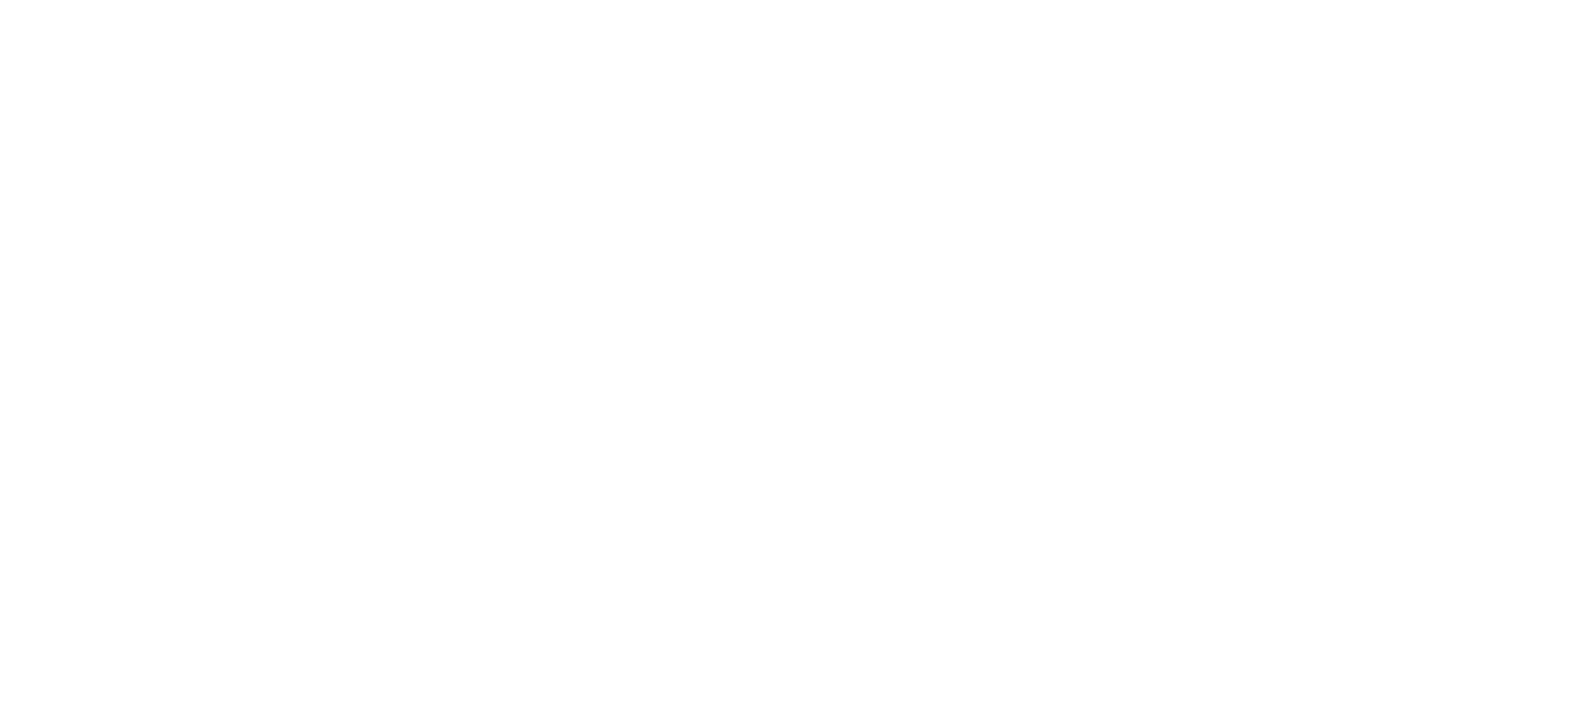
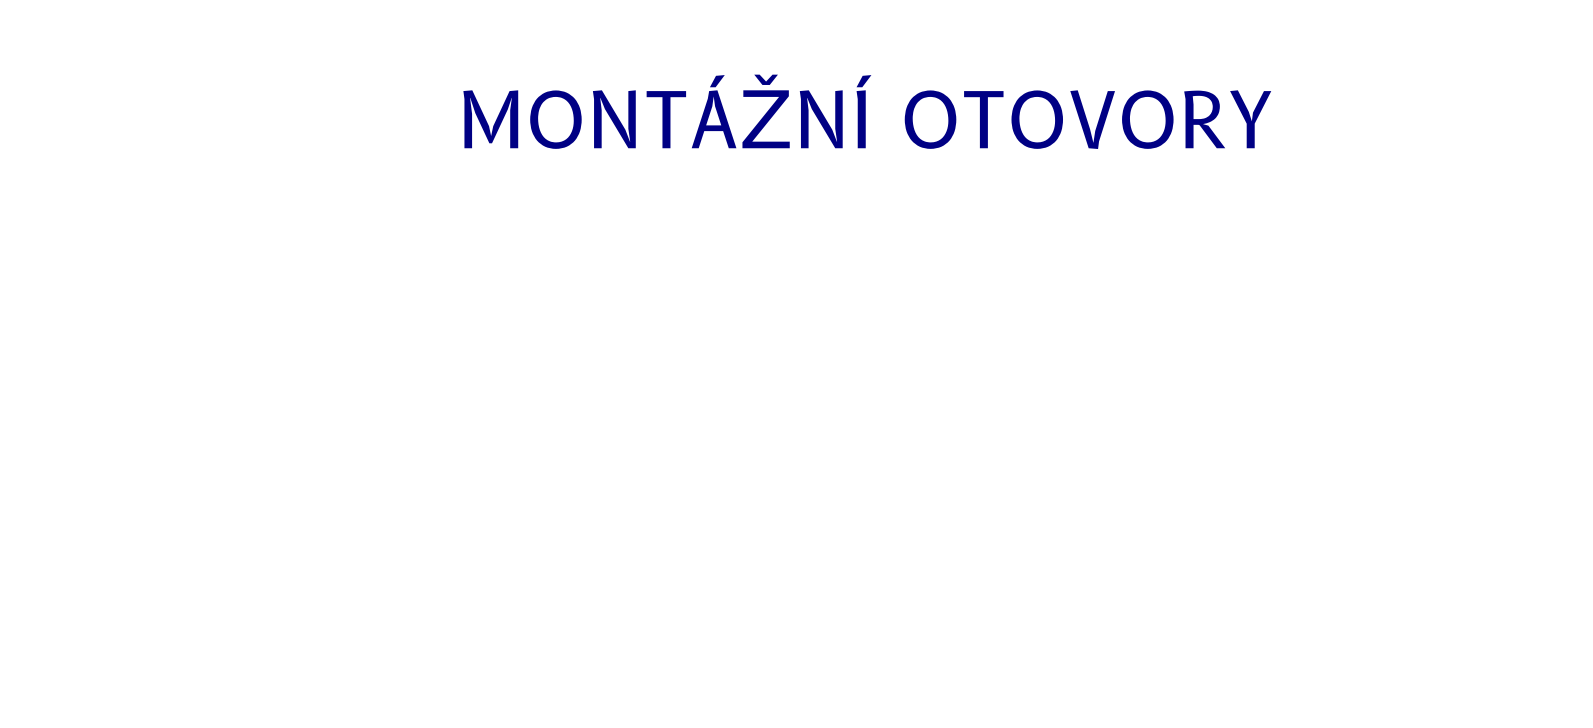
text: none -> MONTÁŽNÍ OTOVORY (867, 111)

